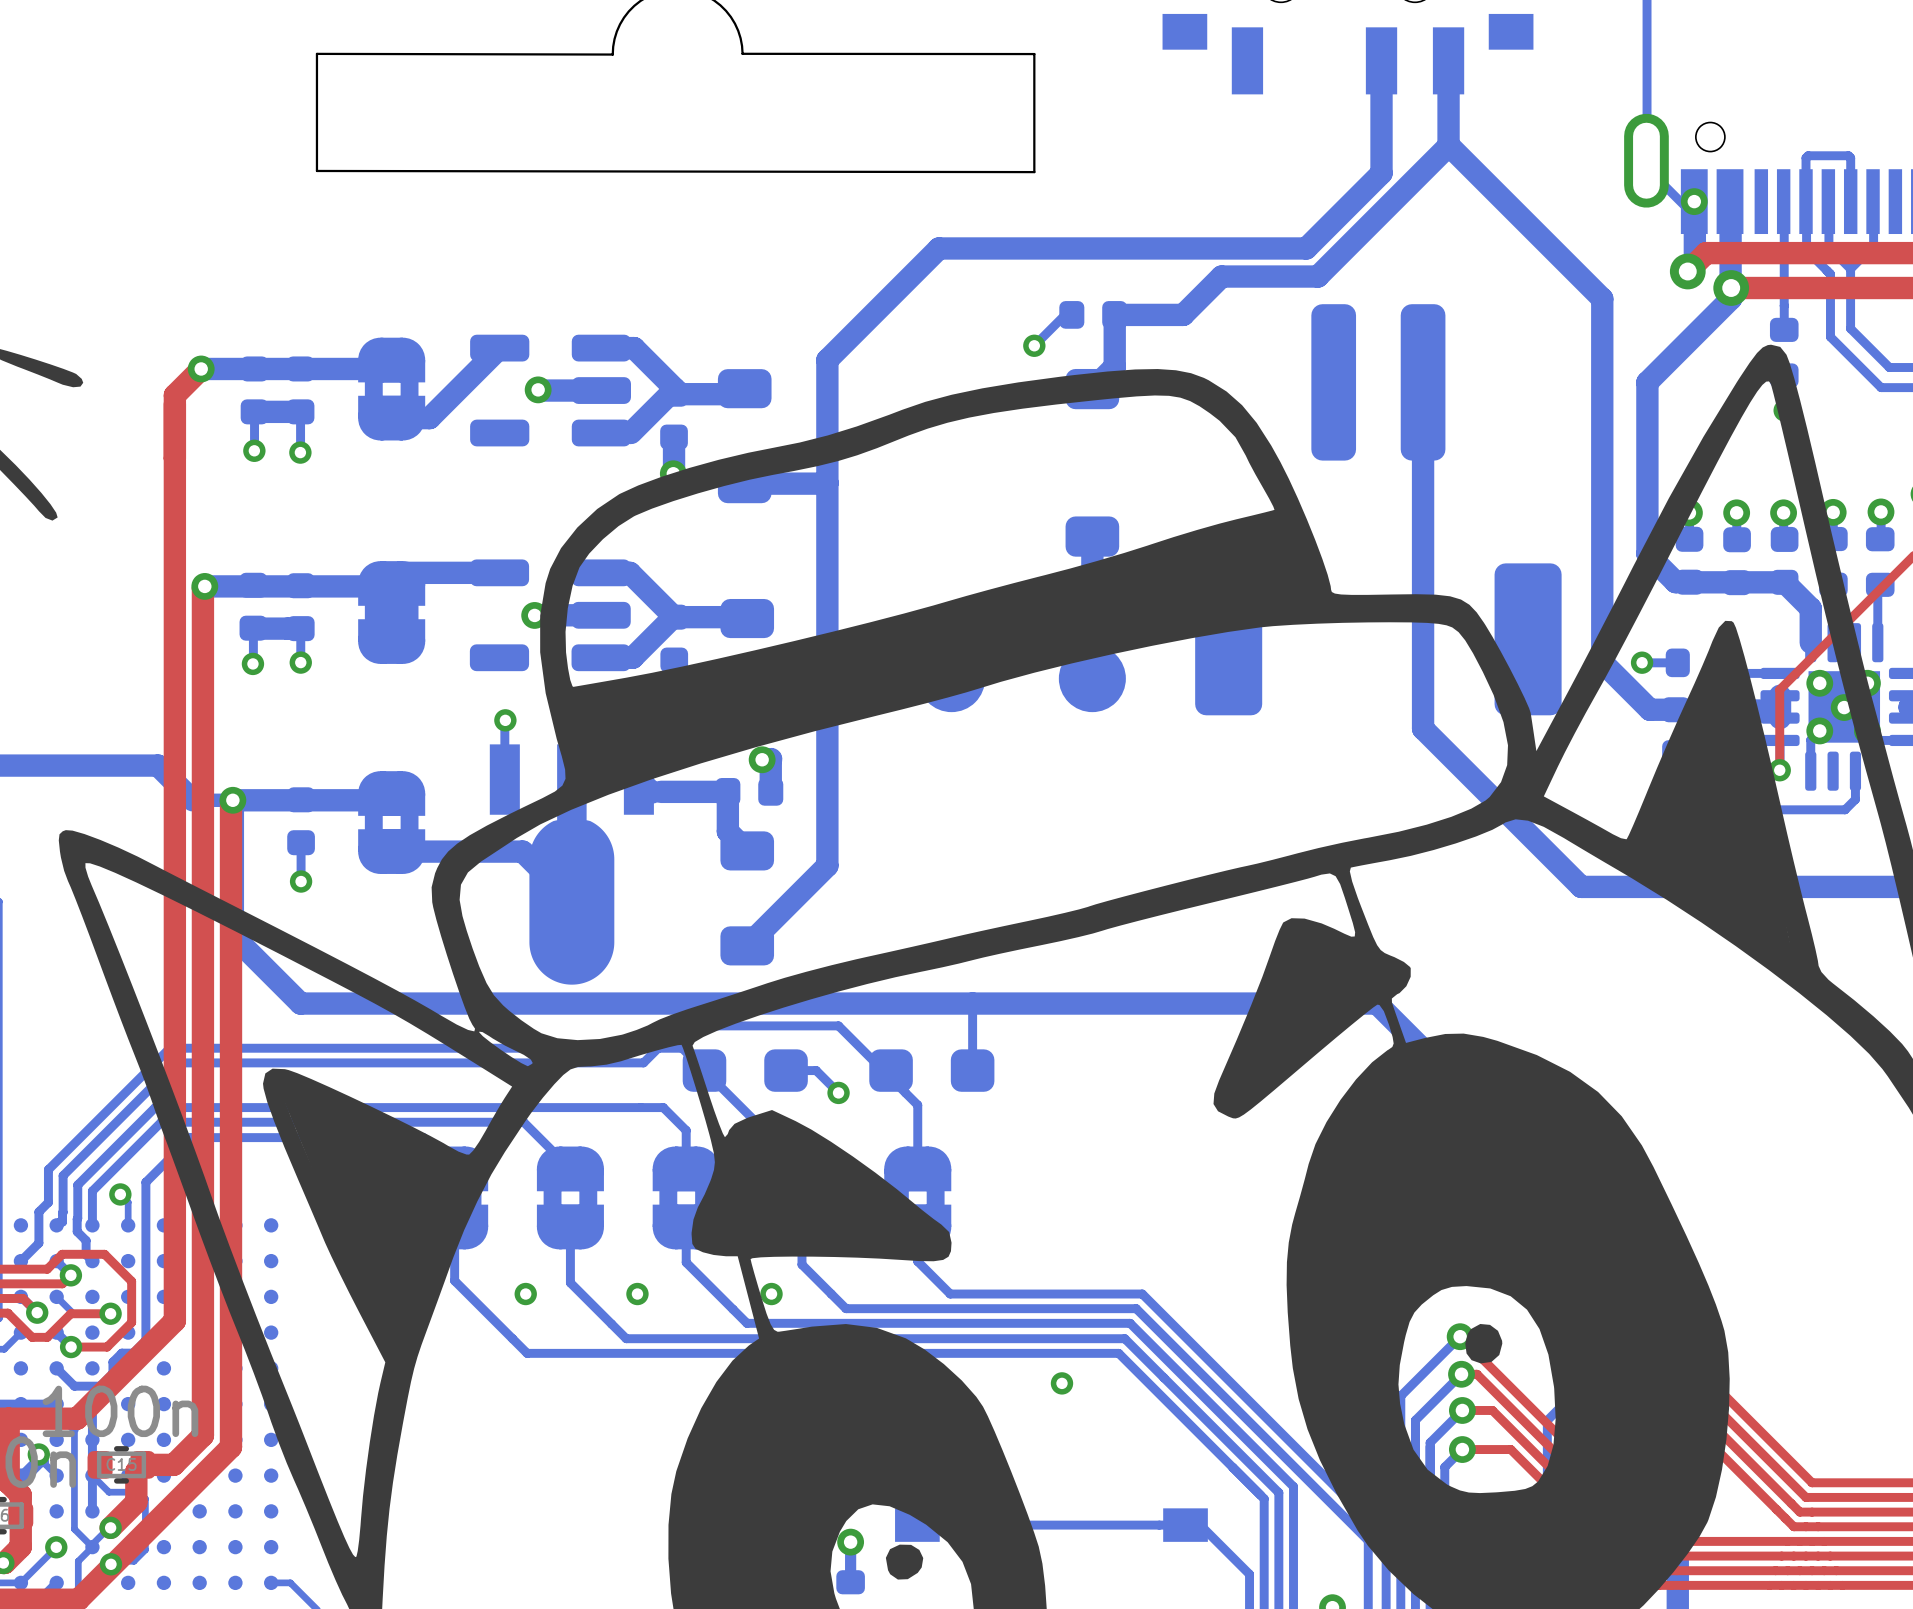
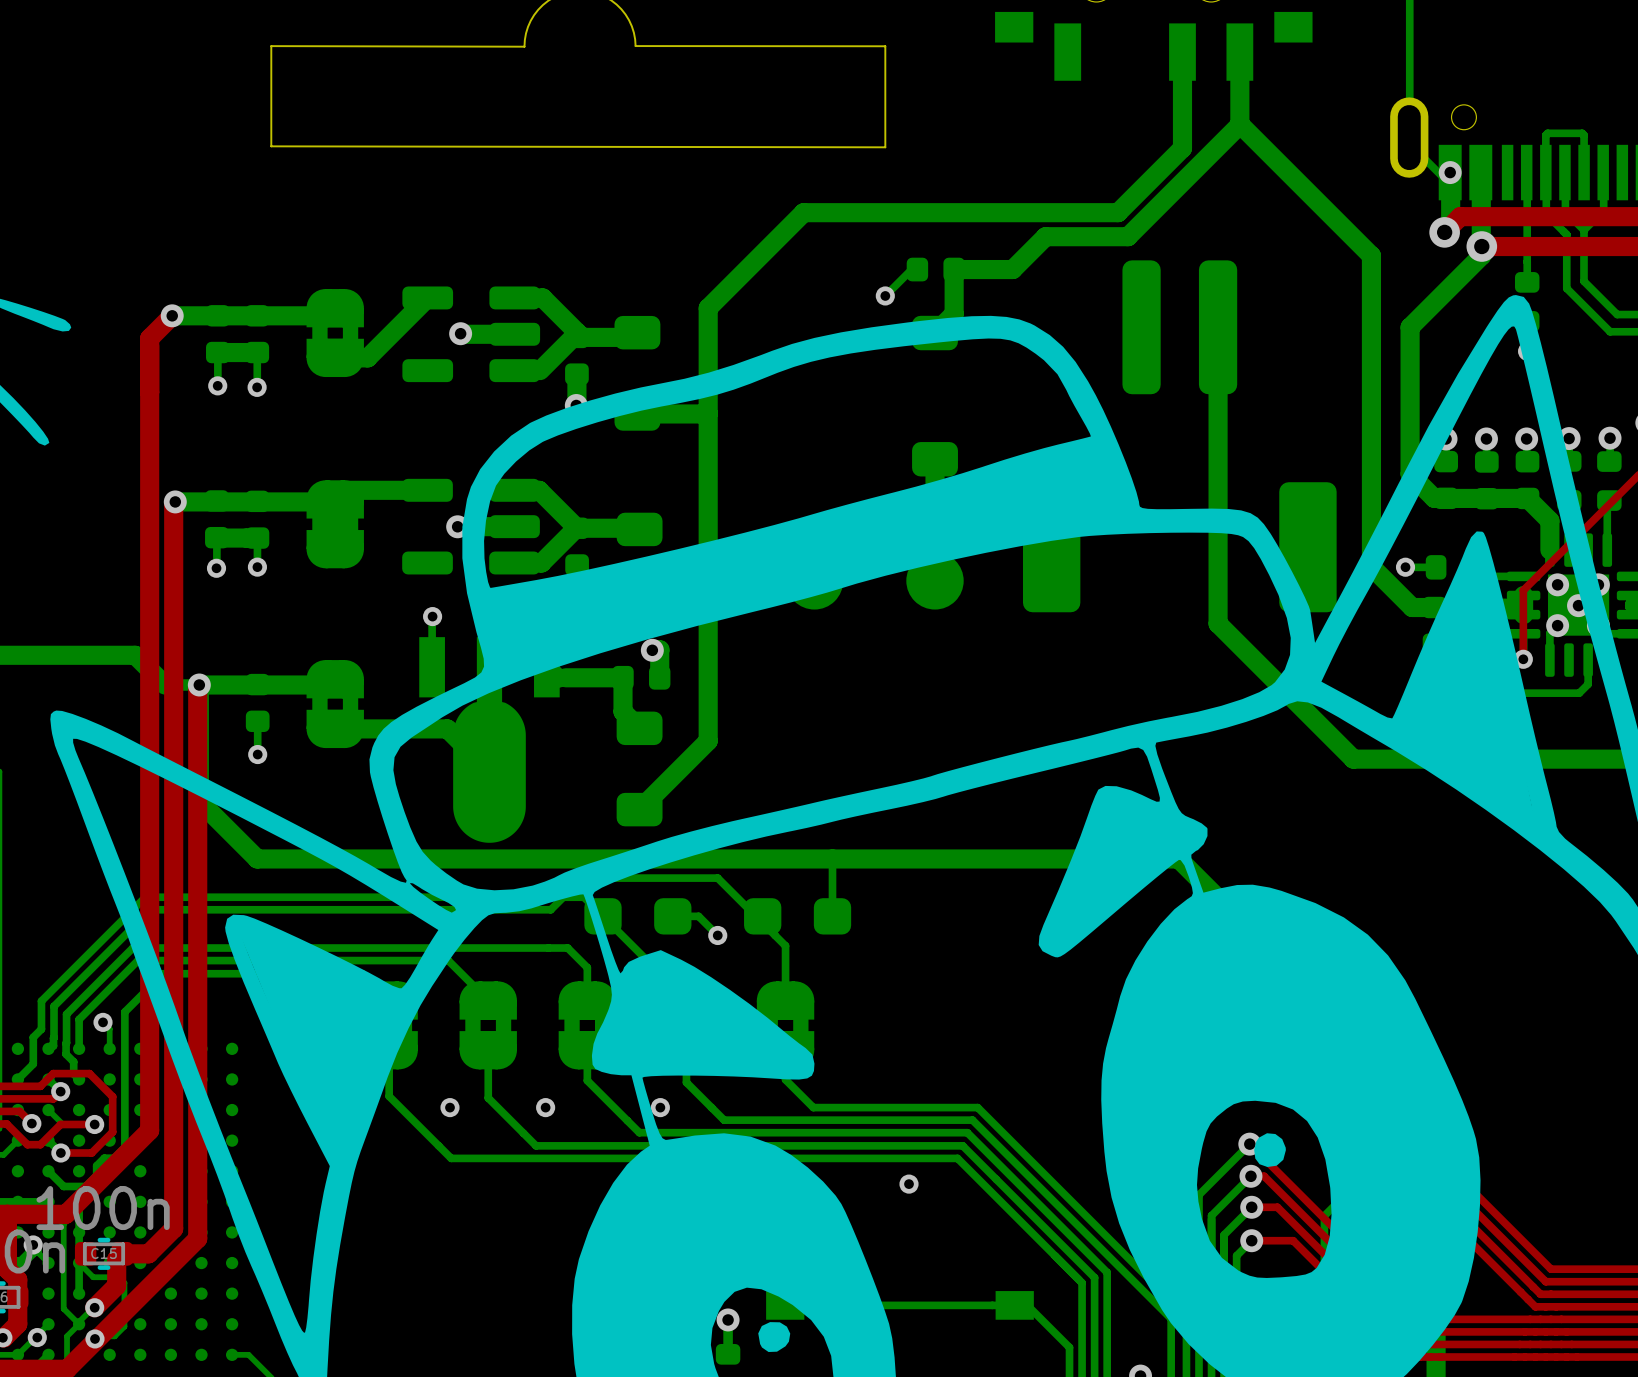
via position: (56, 1547) -> (37, 1337)

